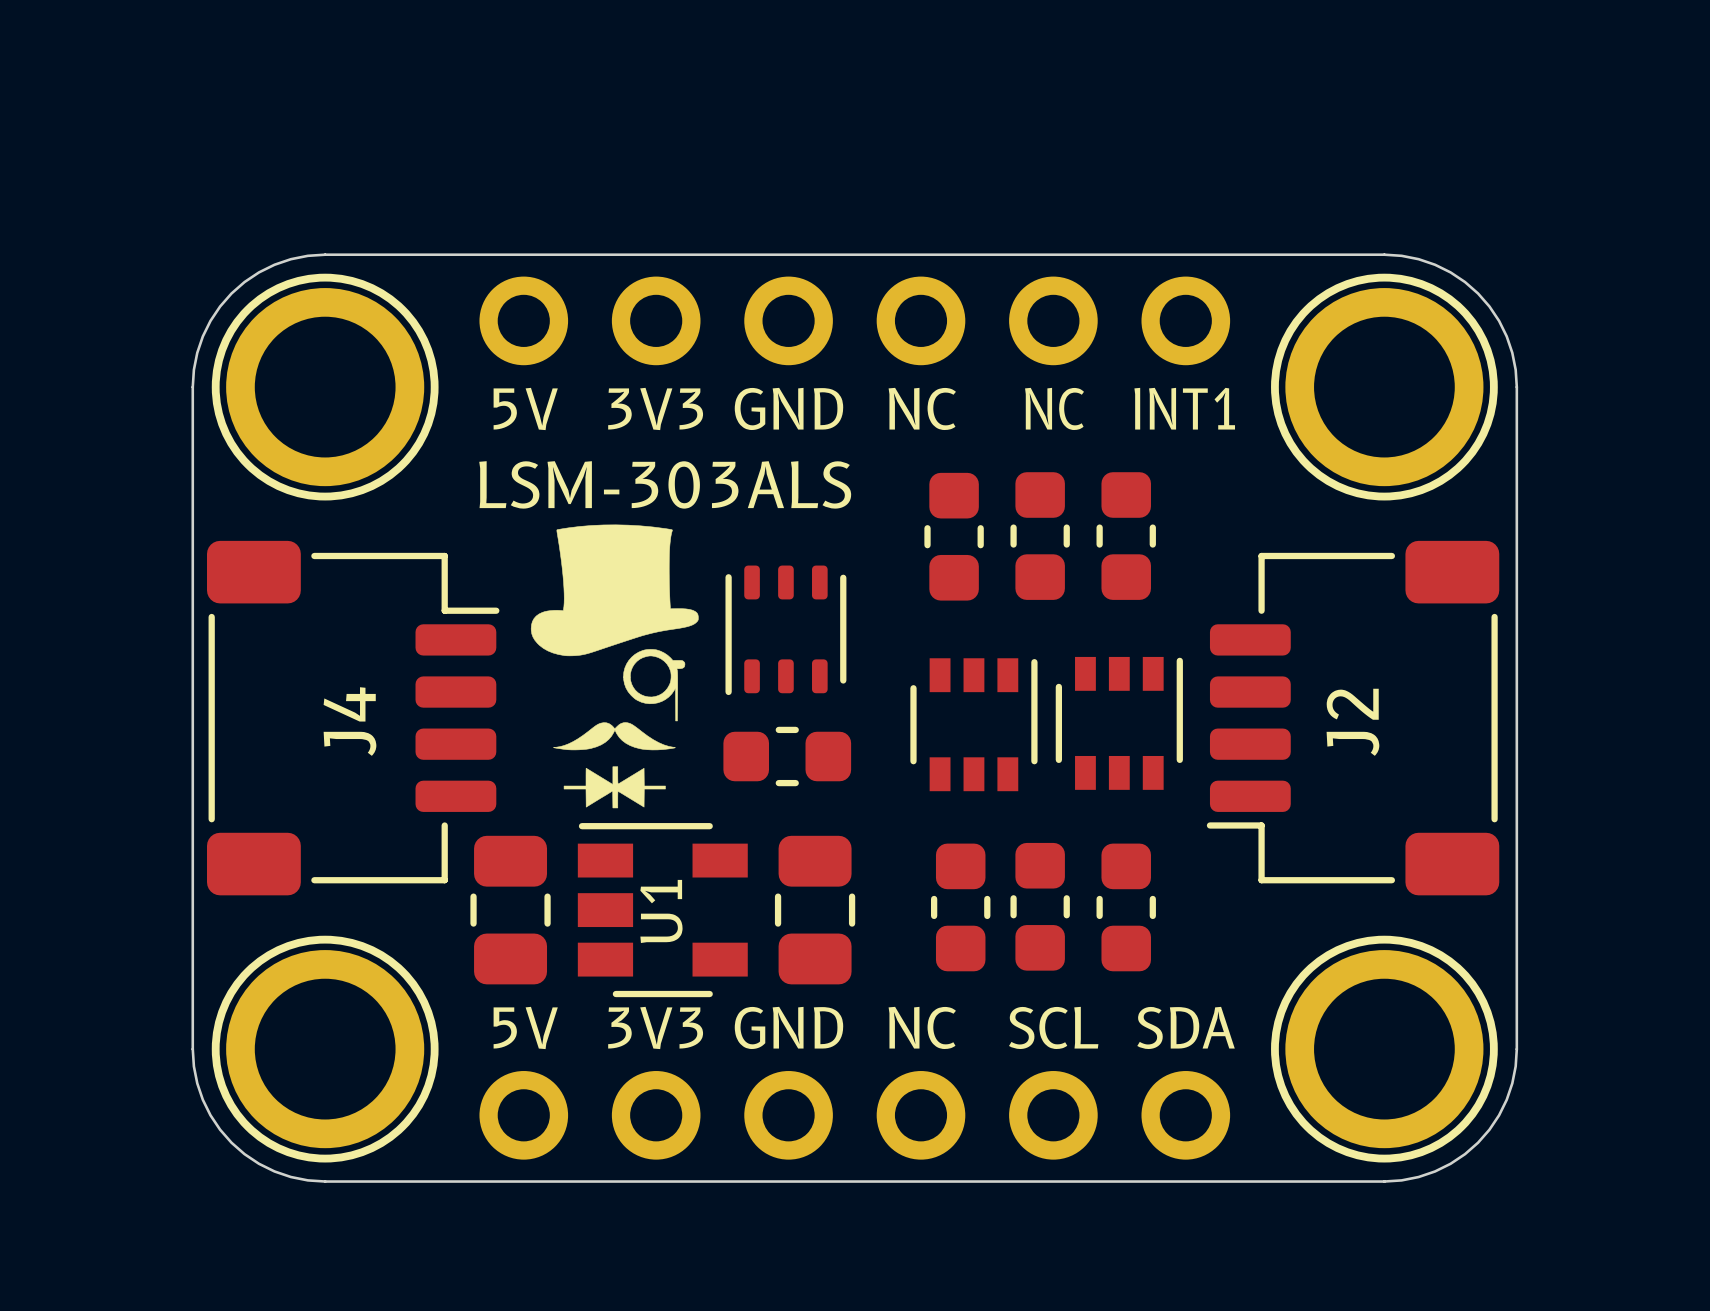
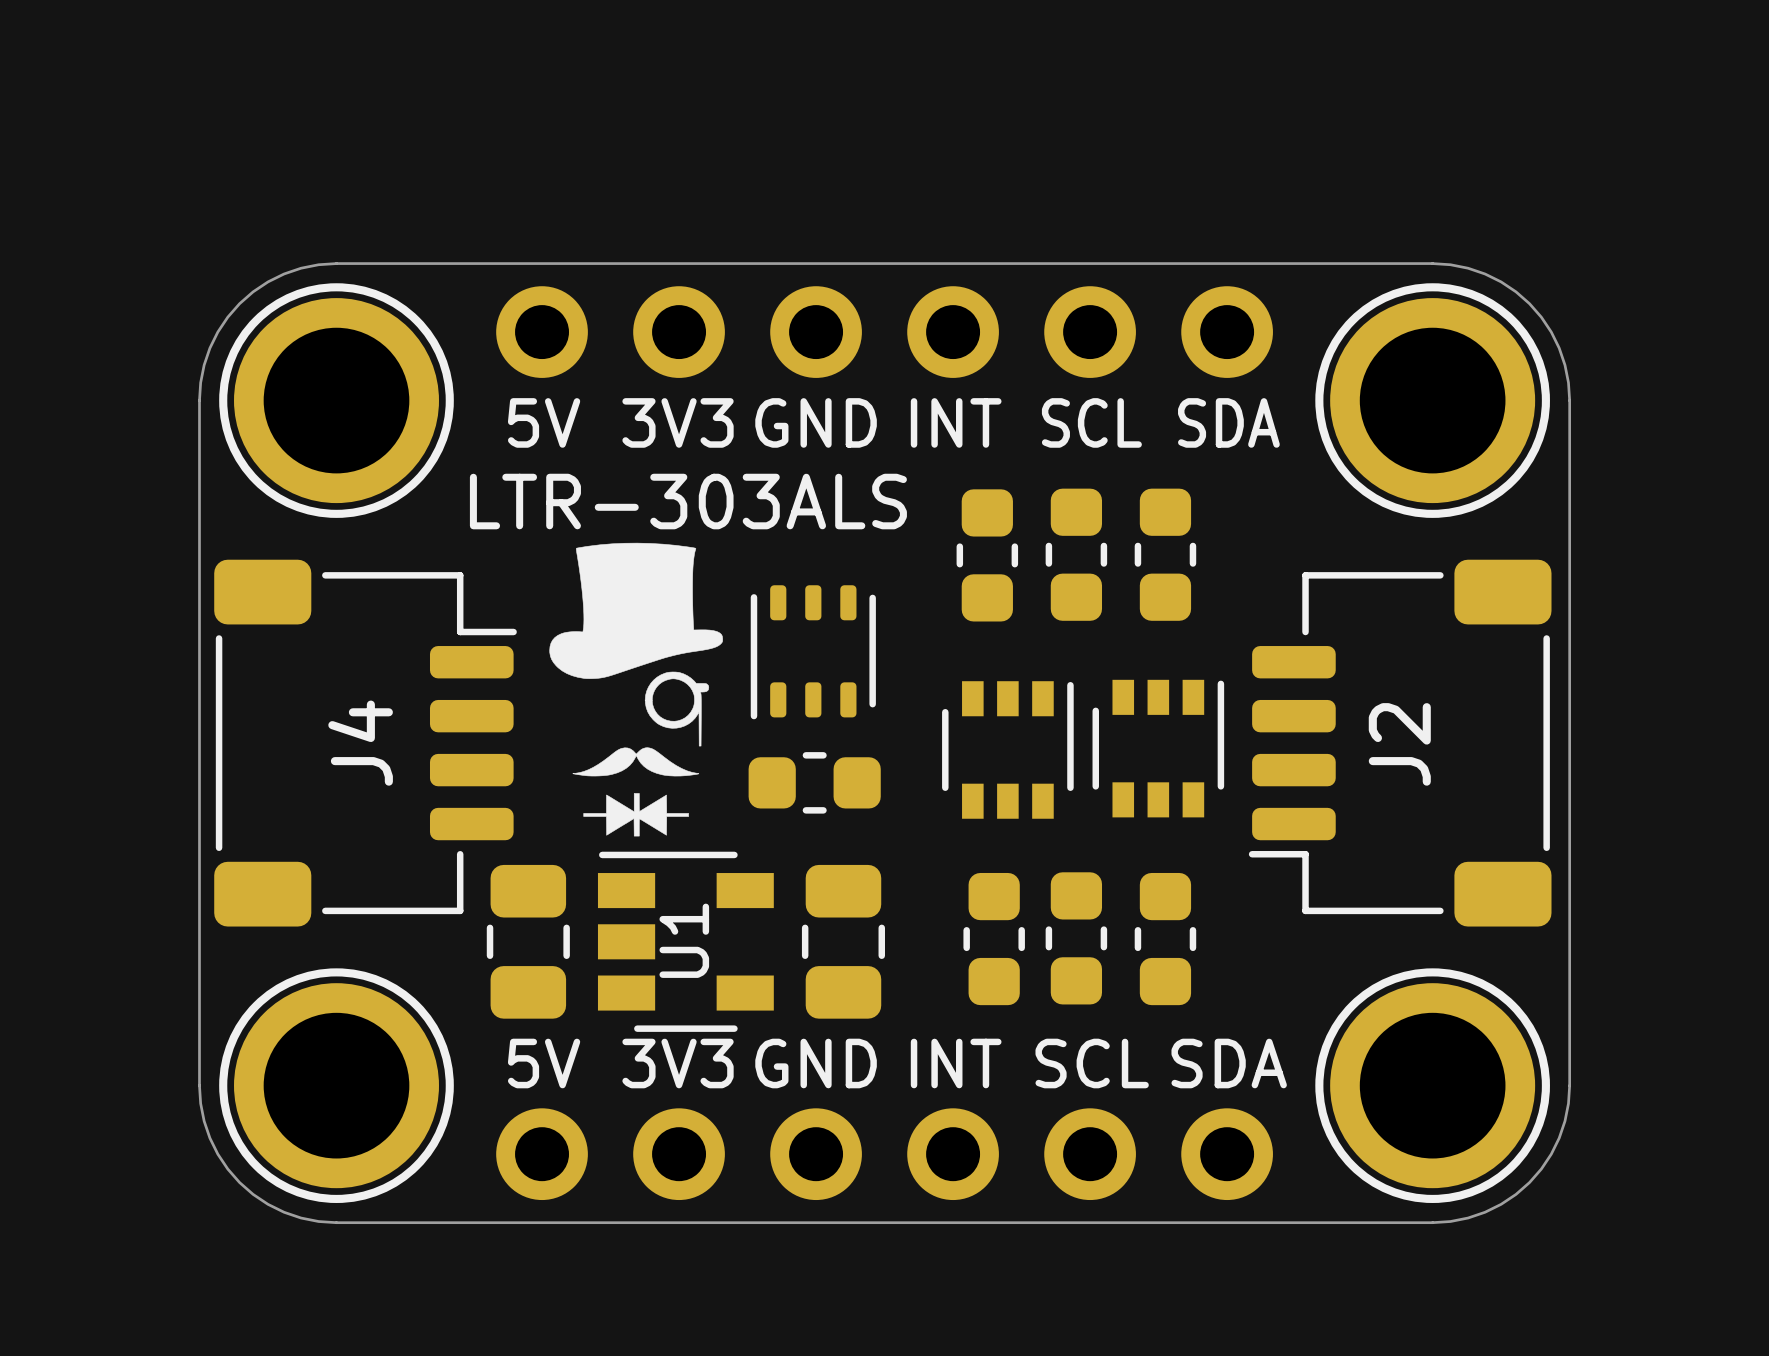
text: NC (922, 408) -> INT (956, 422)
text: NC (1054, 408) -> SCL (1091, 422)
text: INT1 (1184, 408) -> SDA (1228, 422)
LSM-303ALS name: LSM-303ALS (665, 484) -> LTR-303ALS (688, 501)
text: NC (922, 1027) -> INT (956, 1063)

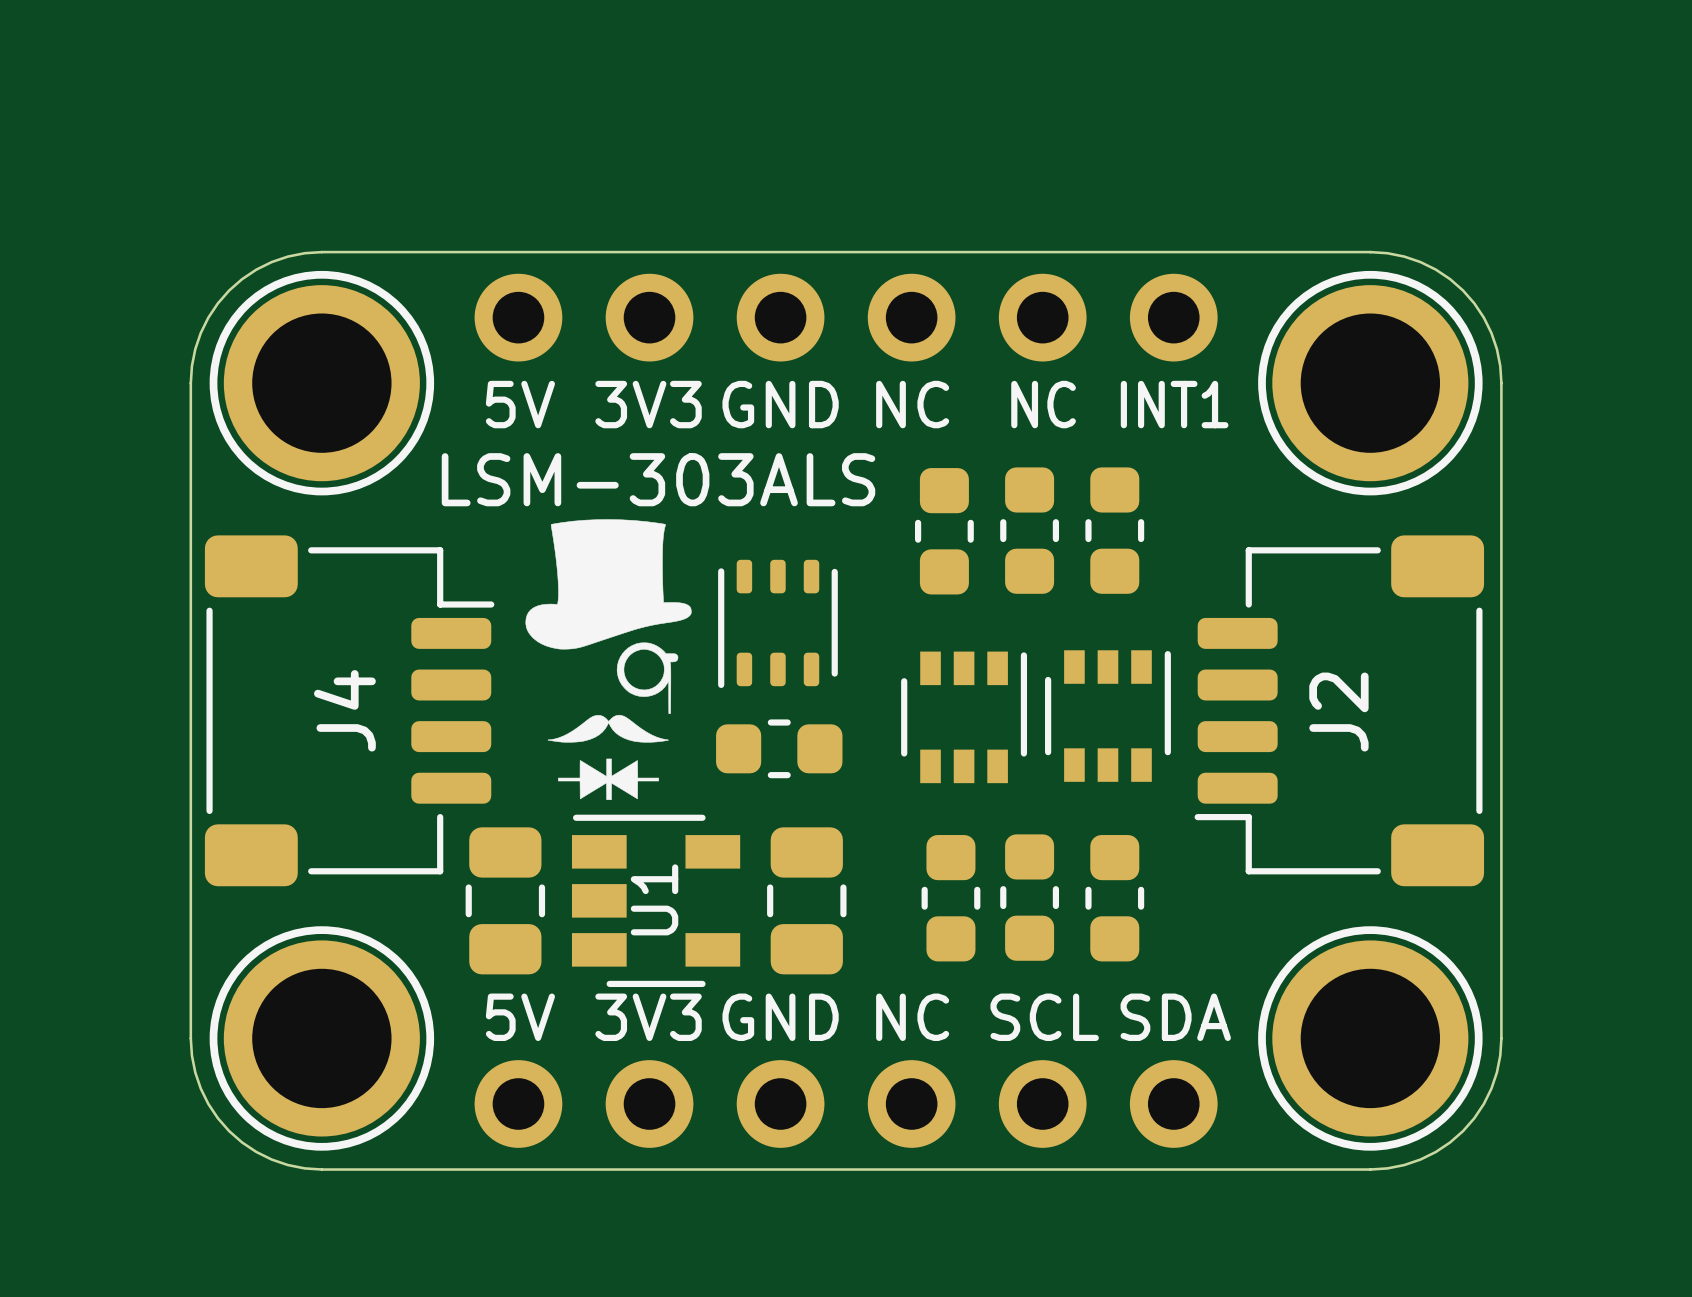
text: INT (956, 422) -> NC (912, 404)
text: SCL (1091, 422) -> NC (1043, 404)
text: SDA (1228, 422) -> INT1 (1174, 404)
LTR-303ALS name: LTR-303ALS (688, 501) -> LSM-303ALS (658, 479)
text: INT (956, 1063) -> NC (912, 1017)

